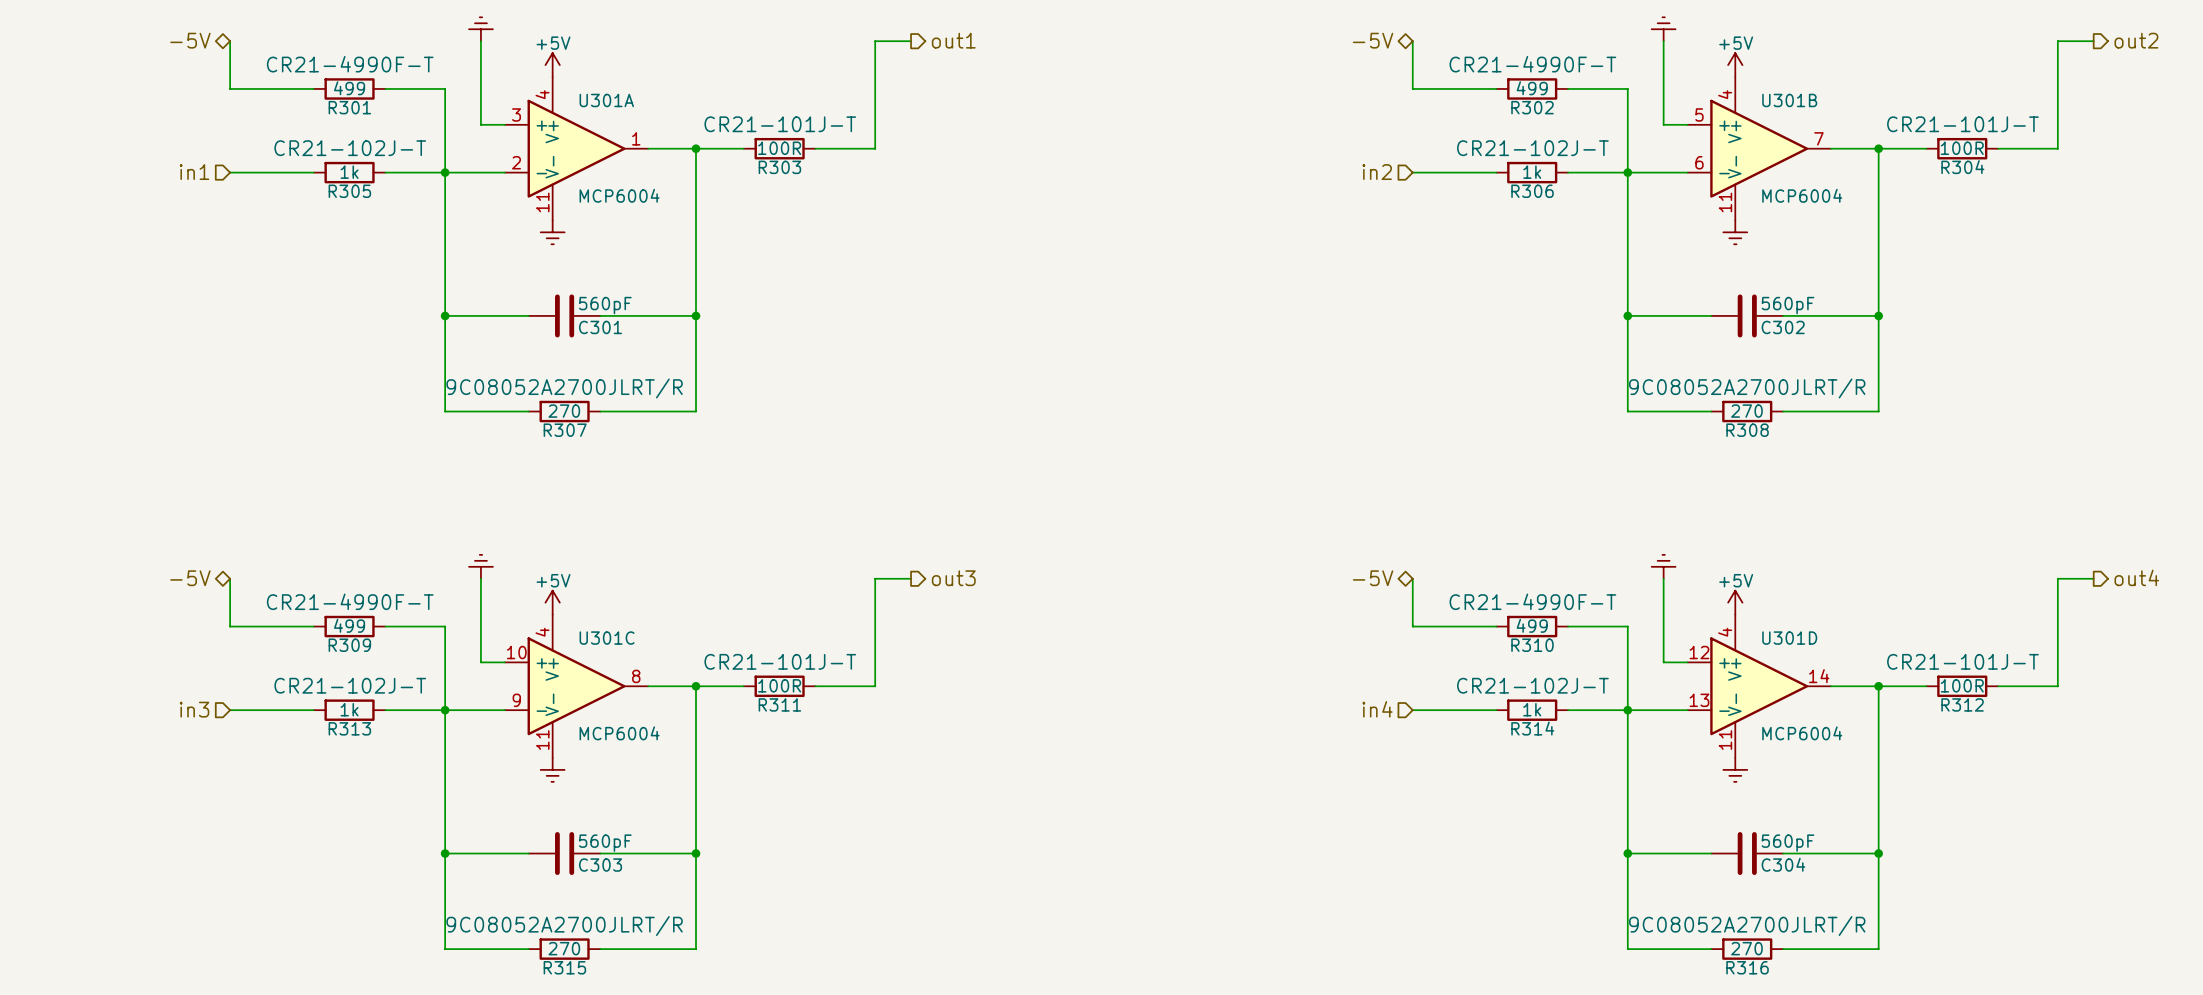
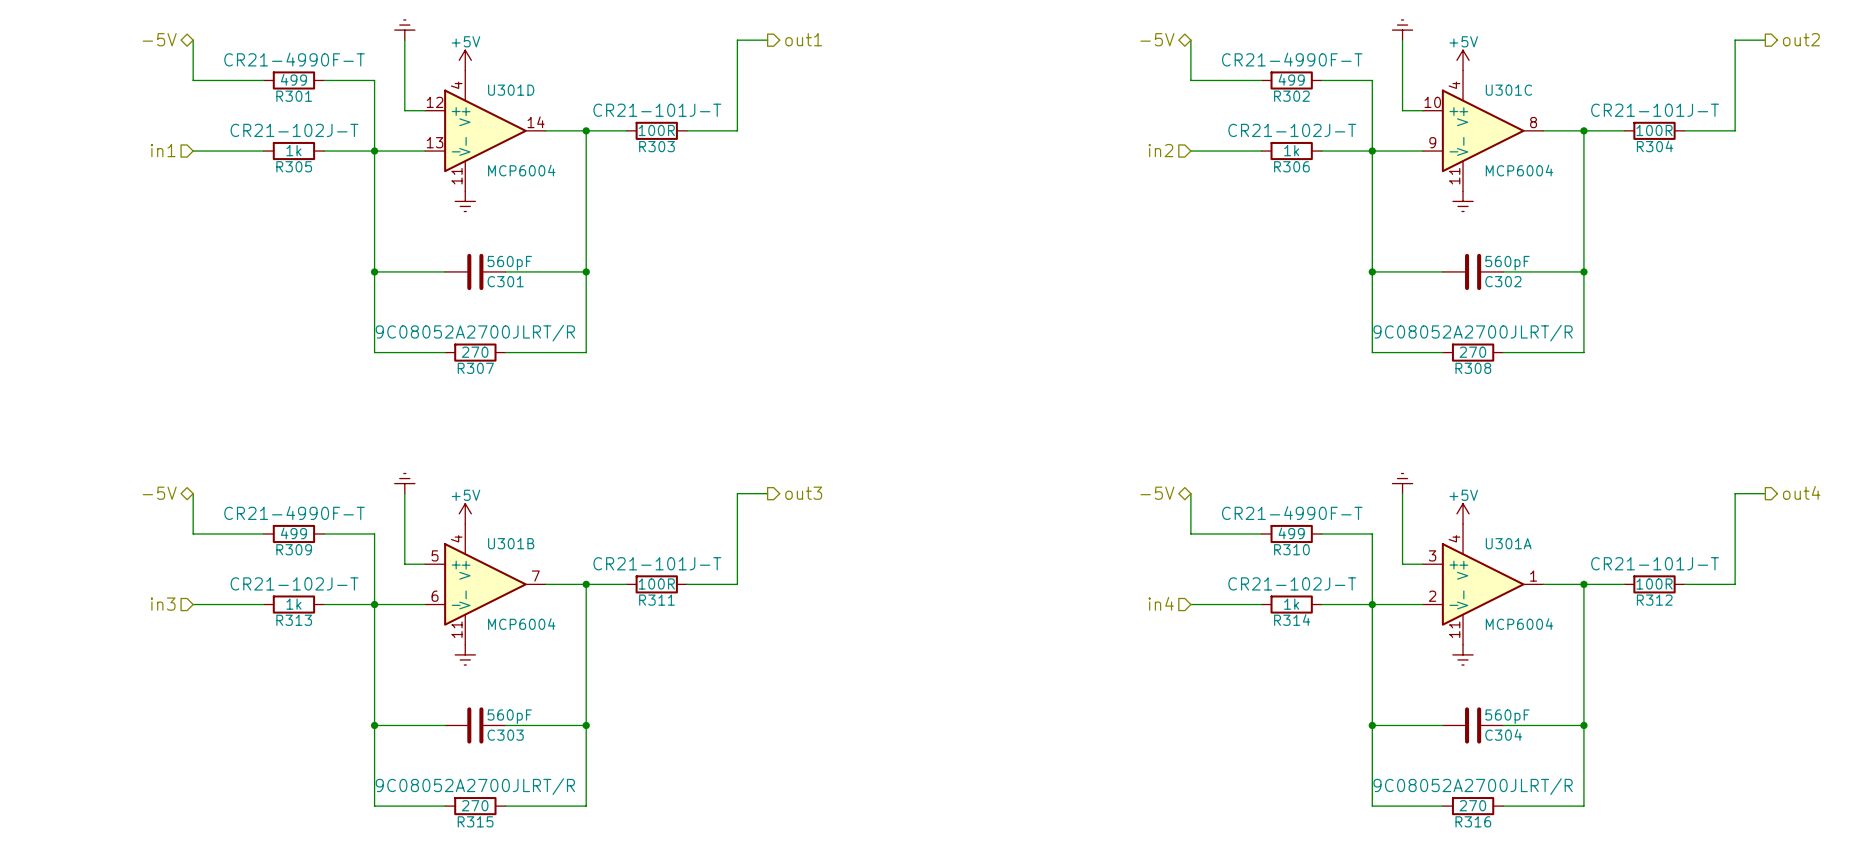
U301A position: (576, 148) -> (1483, 584)
U301B position: (1759, 148) -> (485, 584)
U301C position: (576, 686) -> (1483, 130)
U301D position: (1759, 686) -> (485, 130)

